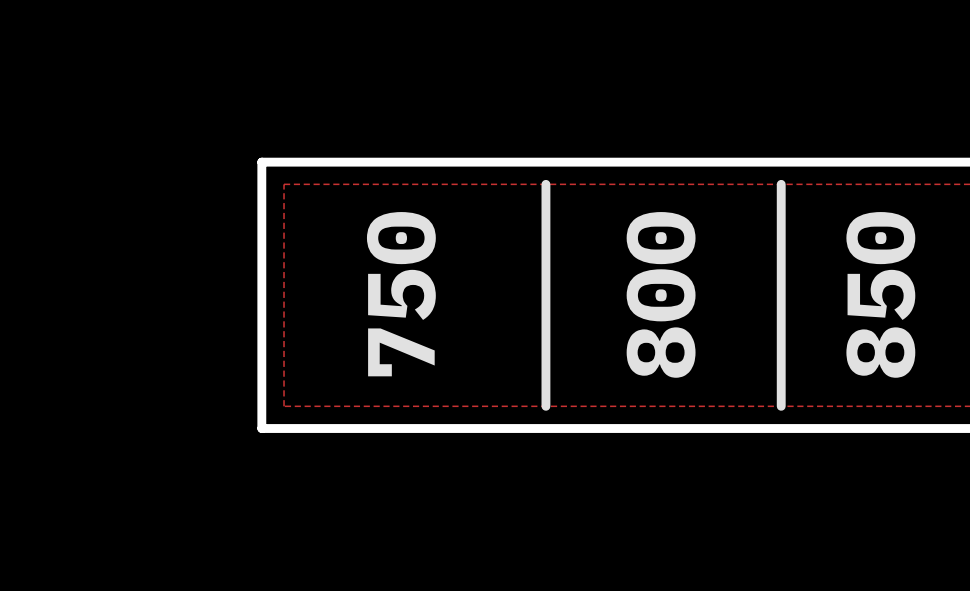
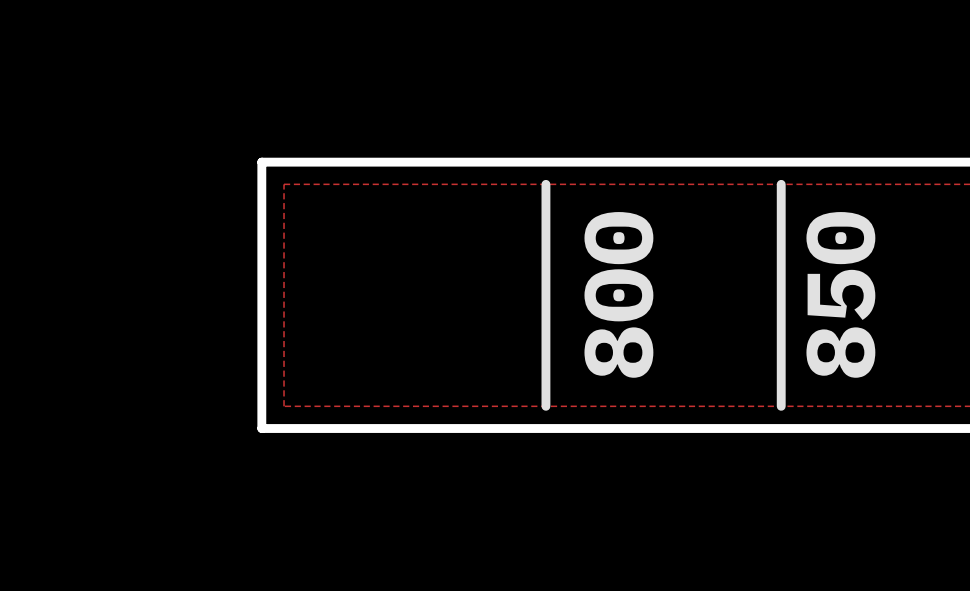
text: 750 (401, 294) -> none
text position: 800 (661, 294) -> 800 (618, 294)
text position: 850 (880, 294) -> 850 (840, 294)

